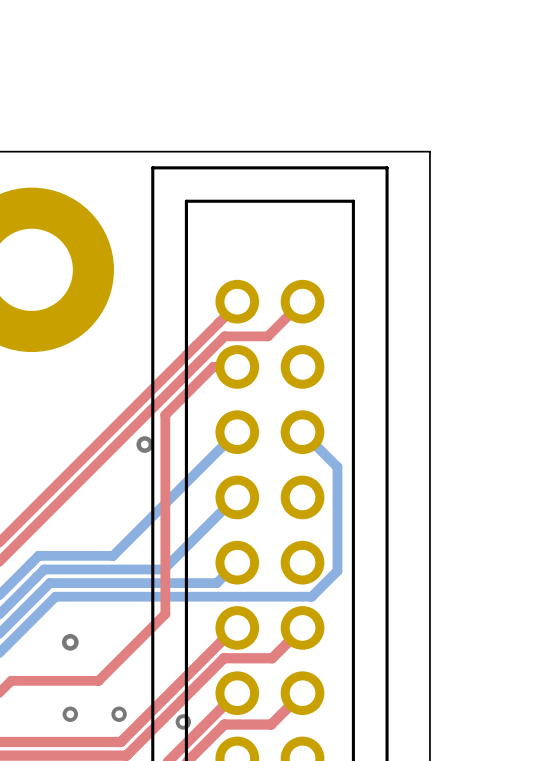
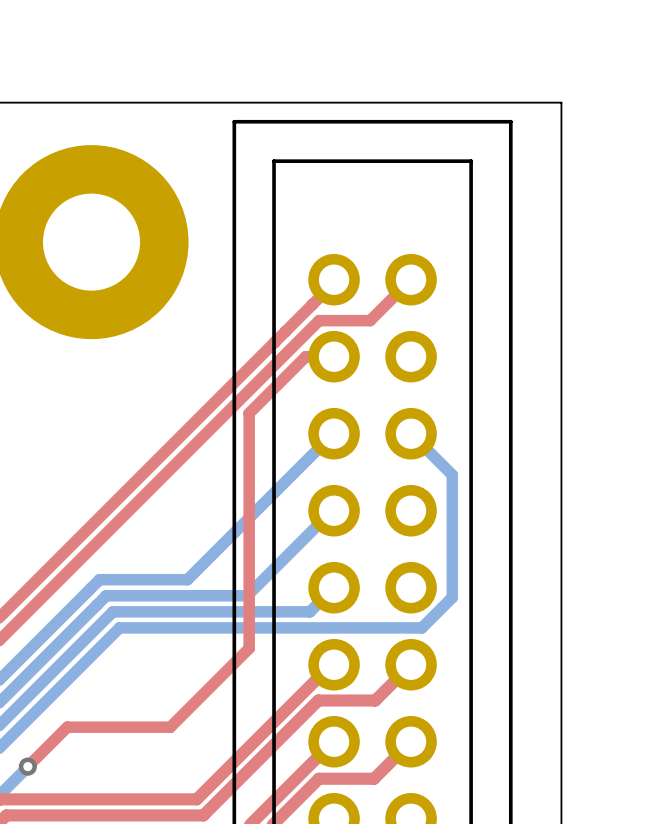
via: (144, 444) -> none
via: (70, 642) -> none
via: (70, 714) -> none
via: (119, 714) -> none
via: (183, 721) -> none

